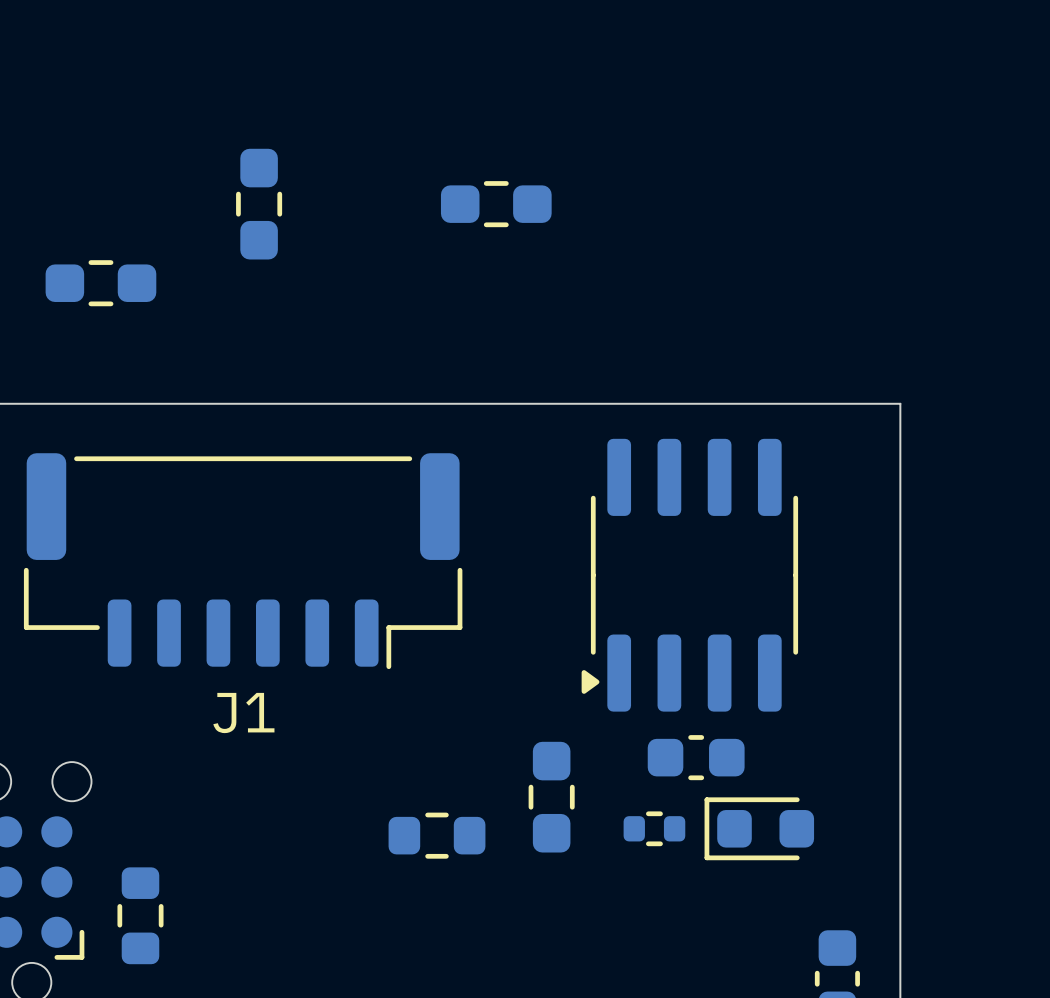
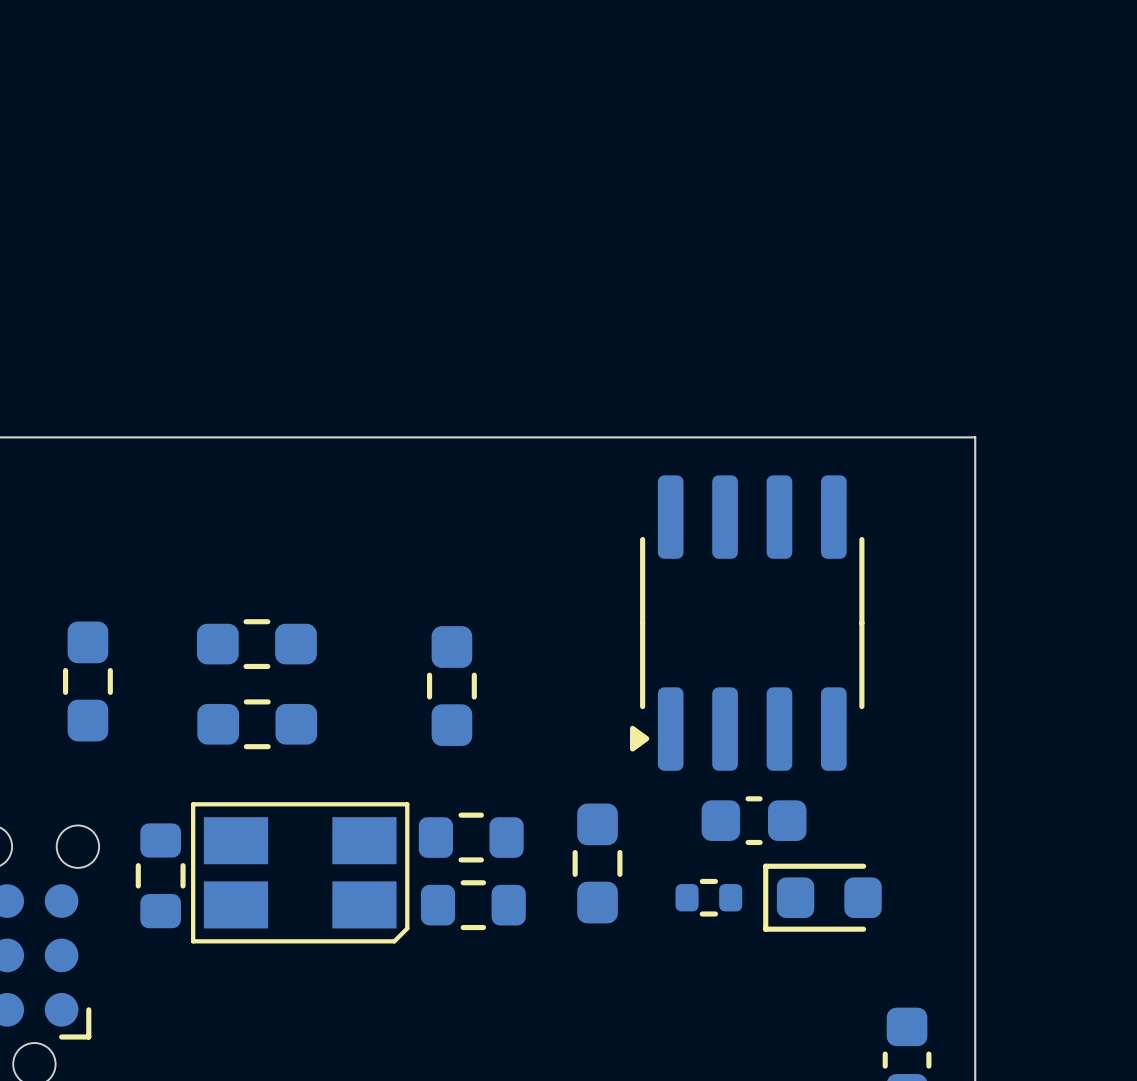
part: (259, 204) -> none
part: (496, 204) -> none
part: (100, 283) -> none
J1: (243, 561) -> none
part: none -> (256, 644)
part: none -> (87, 681)
part: none -> (451, 686)
part: none -> (257, 724)
part: none -> (471, 837)
part: none -> (300, 872)
part position: (140, 915) -> (160, 875)

